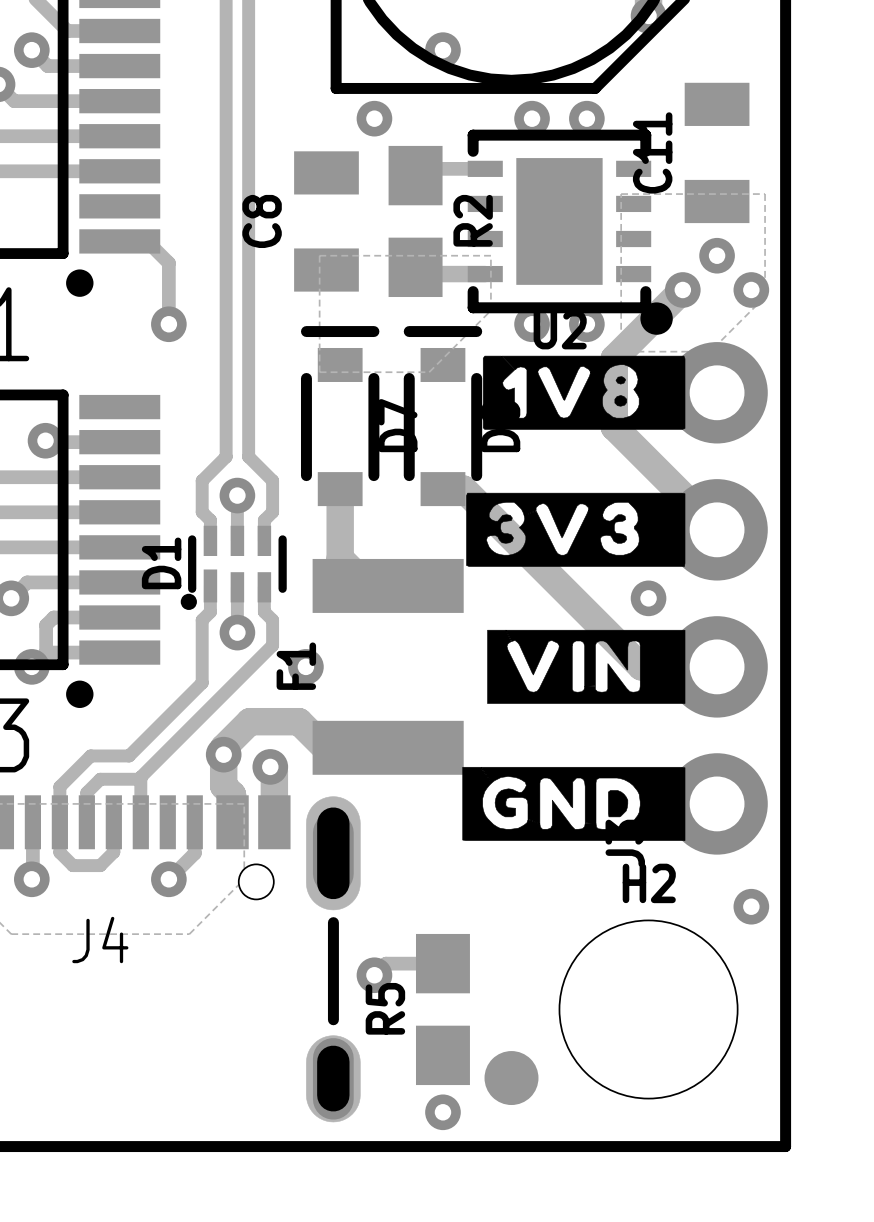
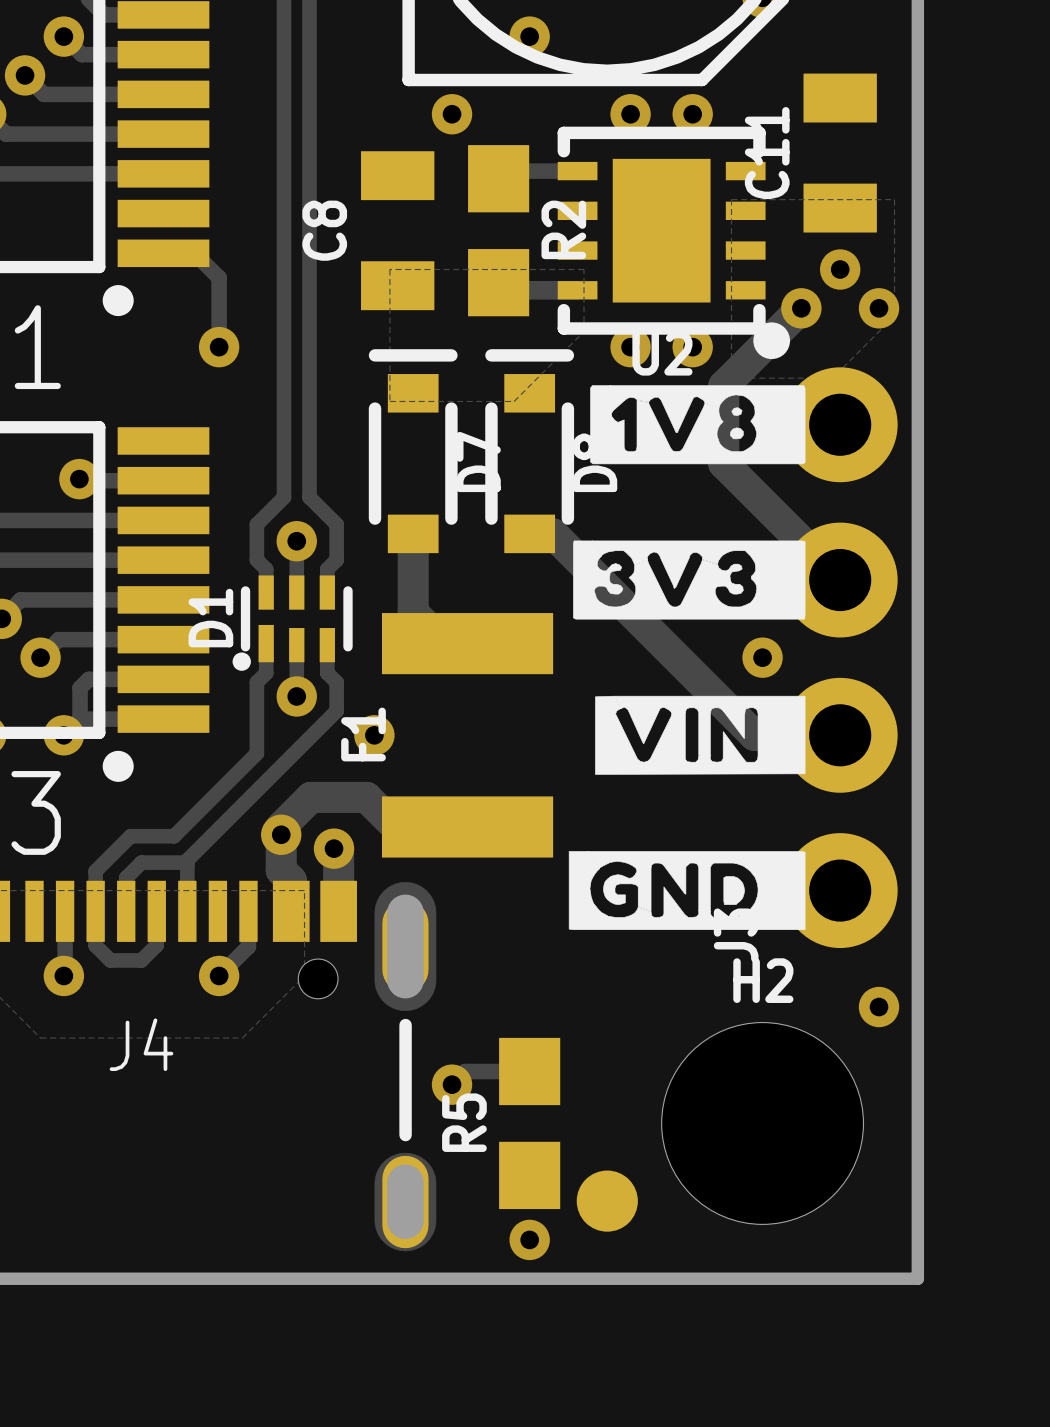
drawing shape: [482, 355, 686, 430] -> [590, 385, 806, 465]
drawing shape: [466, 492, 686, 567] -> [573, 540, 806, 620]
drawing shape: [487, 629, 686, 704] -> [595, 695, 806, 775]
drawing shape: [462, 766, 686, 841] -> [568, 851, 806, 931]

